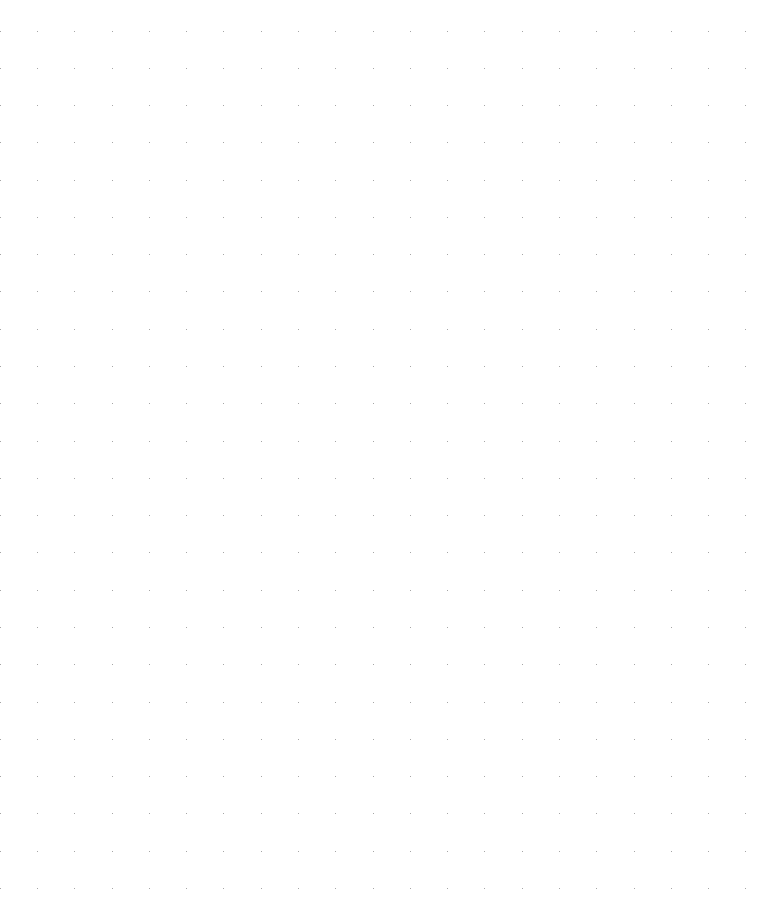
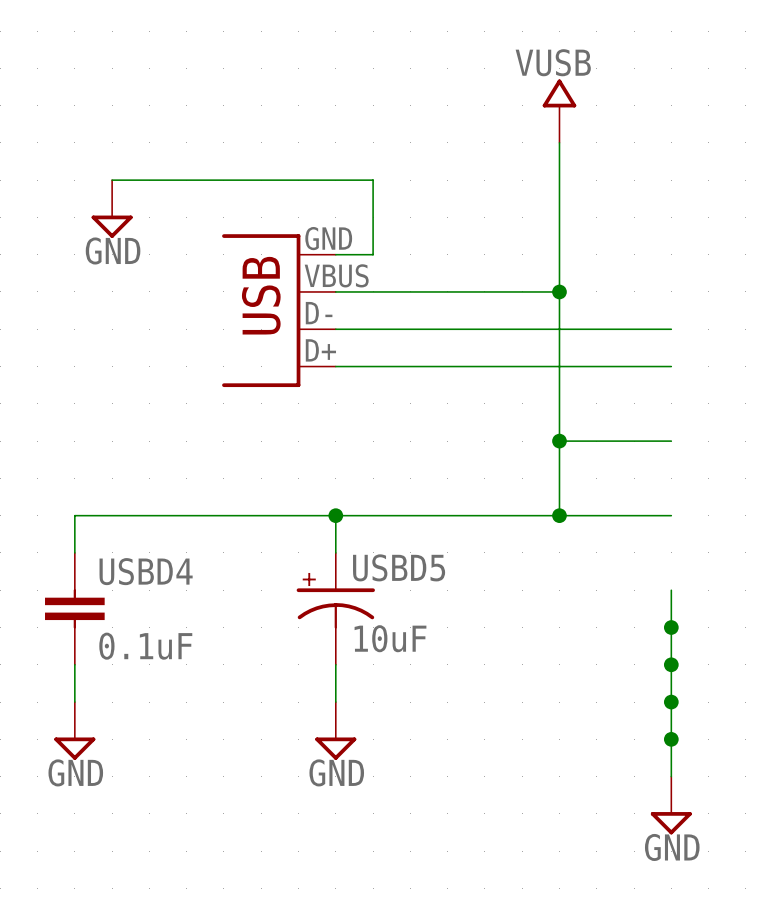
power symbol: none -> VUSB (559, 111)
wire: none -> (559, 142) (559, 515)
wire: none -> (112, 180) (373, 180) (373, 254) (335, 254)
power symbol: none -> GND (112, 209)
wire: none -> (335, 291) (559, 291)
junction: none -> (559, 291)
part: none -> (278, 310)
wire: none -> (335, 329) (671, 329)
wire: none -> (335, 366) (671, 366)
wire: none -> (559, 441) (671, 441)
junction: none -> (559, 441)
wire: none -> (335, 515) (335, 552)
junction: none -> (335, 515)
junction: none -> (559, 515)
wire: none -> (671, 515) (74, 515) (74, 552)
wire: none -> (671, 590) (671, 776)
USBD4: none -> 0.1uF (74, 608)
USBD5: none -> 10uF (335, 608)
junction: none -> (671, 627)
wire: none -> (74, 664) (74, 702)
wire: none -> (335, 664) (335, 702)
junction: none -> (671, 664)
junction: none -> (671, 702)
power symbol: none -> GND (74, 730)
power symbol: none -> GND (335, 730)
junction: none -> (671, 739)
power symbol: none -> GND (671, 805)

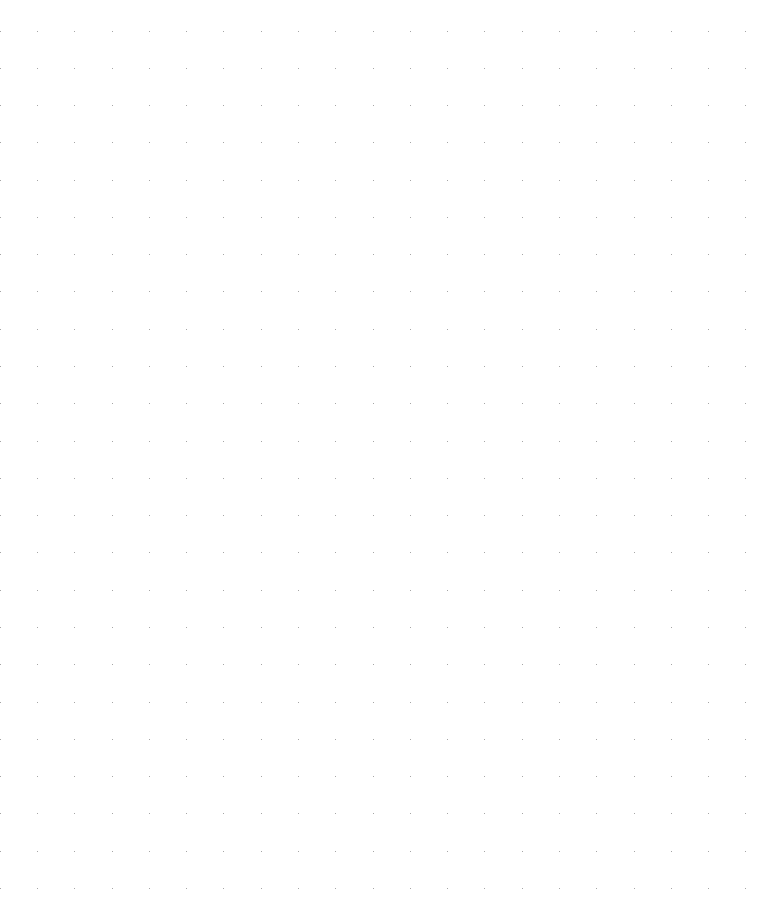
power symbol: VUSB (559, 111) -> none
wire: (559, 142) (559, 515) -> none
wire: (112, 180) (373, 180) (373, 254) (335, 254) -> none
power symbol: GND (112, 209) -> none
wire: (335, 291) (559, 291) -> none
junction: (559, 291) -> none
part: (278, 310) -> none
wire: (335, 329) (671, 329) -> none
wire: (335, 366) (671, 366) -> none
wire: (559, 441) (671, 441) -> none
junction: (559, 441) -> none
wire: (335, 515) (335, 552) -> none
junction: (335, 515) -> none
junction: (559, 515) -> none
wire: (671, 515) (74, 515) (74, 552) -> none
wire: (671, 590) (671, 776) -> none
USBD4: 0.1uF (74, 608) -> none
USBD5: 10uF (335, 608) -> none
junction: (671, 627) -> none
wire: (74, 664) (74, 702) -> none
wire: (335, 664) (335, 702) -> none
junction: (671, 664) -> none
junction: (671, 702) -> none
power symbol: GND (74, 730) -> none
power symbol: GND (335, 730) -> none
junction: (671, 739) -> none
power symbol: GND (671, 805) -> none

